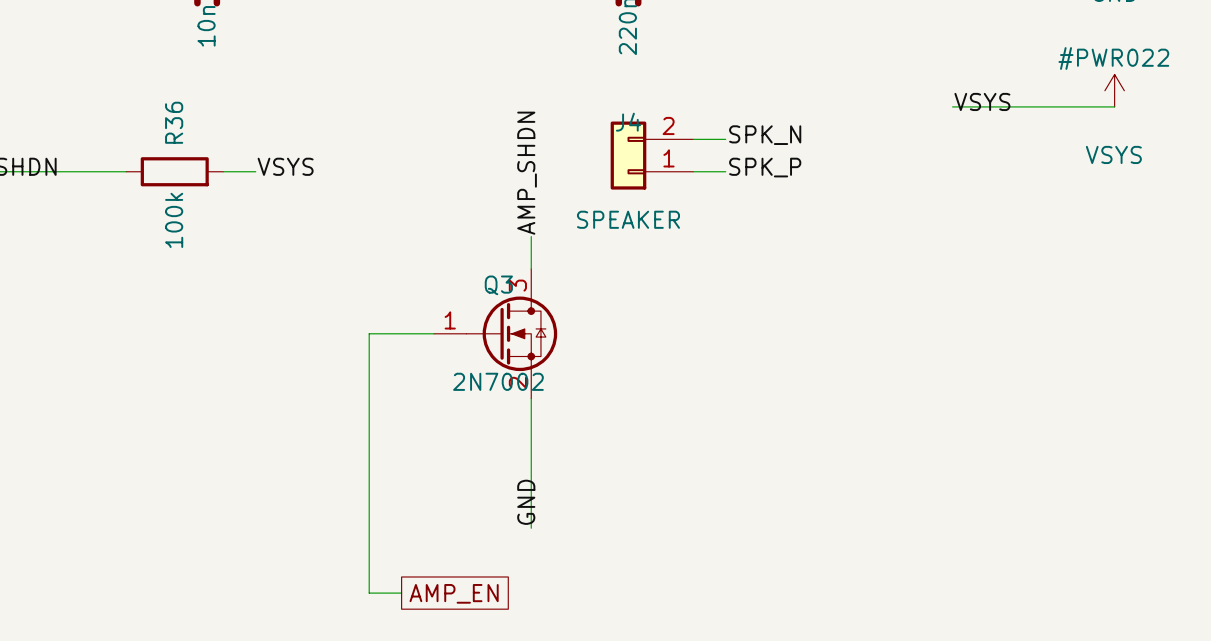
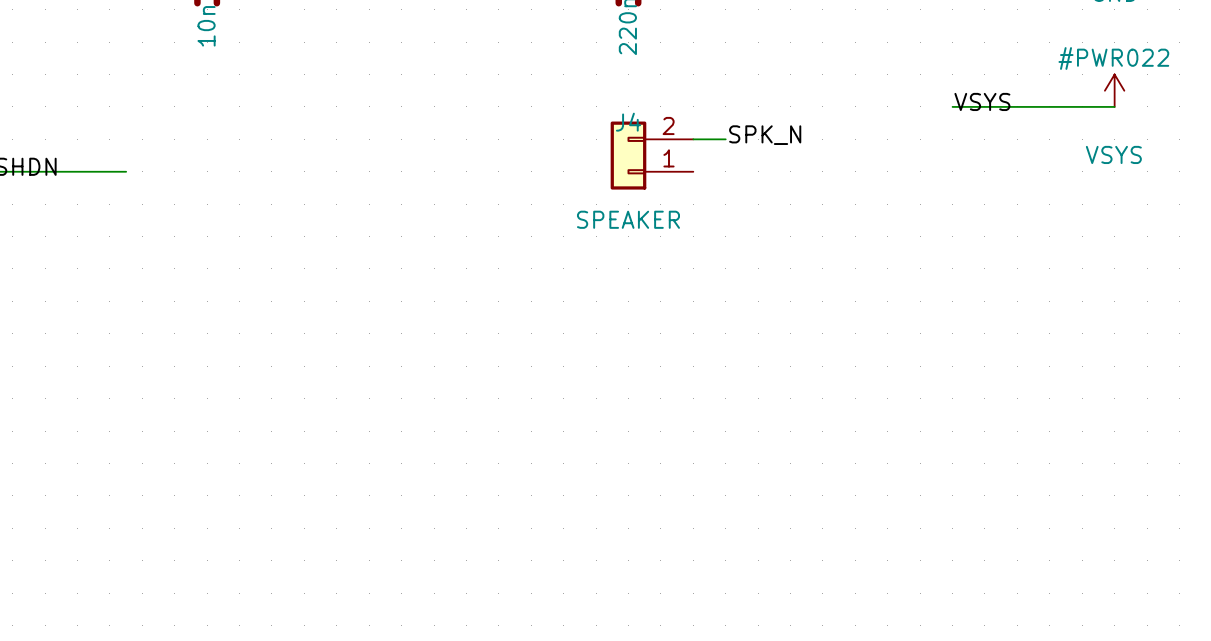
label: VSYS (285, 166) -> none
label: SPK_P (765, 167) -> none
R36: 100k (174, 171) -> none
wire: (223, 171) (255, 171) -> none
wire: (693, 171) (725, 171) -> none
label: AMP_SHDN (527, 173) -> none
wire: (531, 236) (531, 268) -> none
wire: (434, 333) (369, 333) (369, 593) (401, 593) -> none
Q3: 2N7002 (495, 333) -> none
wire: (531, 398) (531, 528) -> none
label: GND (526, 502) -> none
global label: AMP_EN (454, 593) -> none

